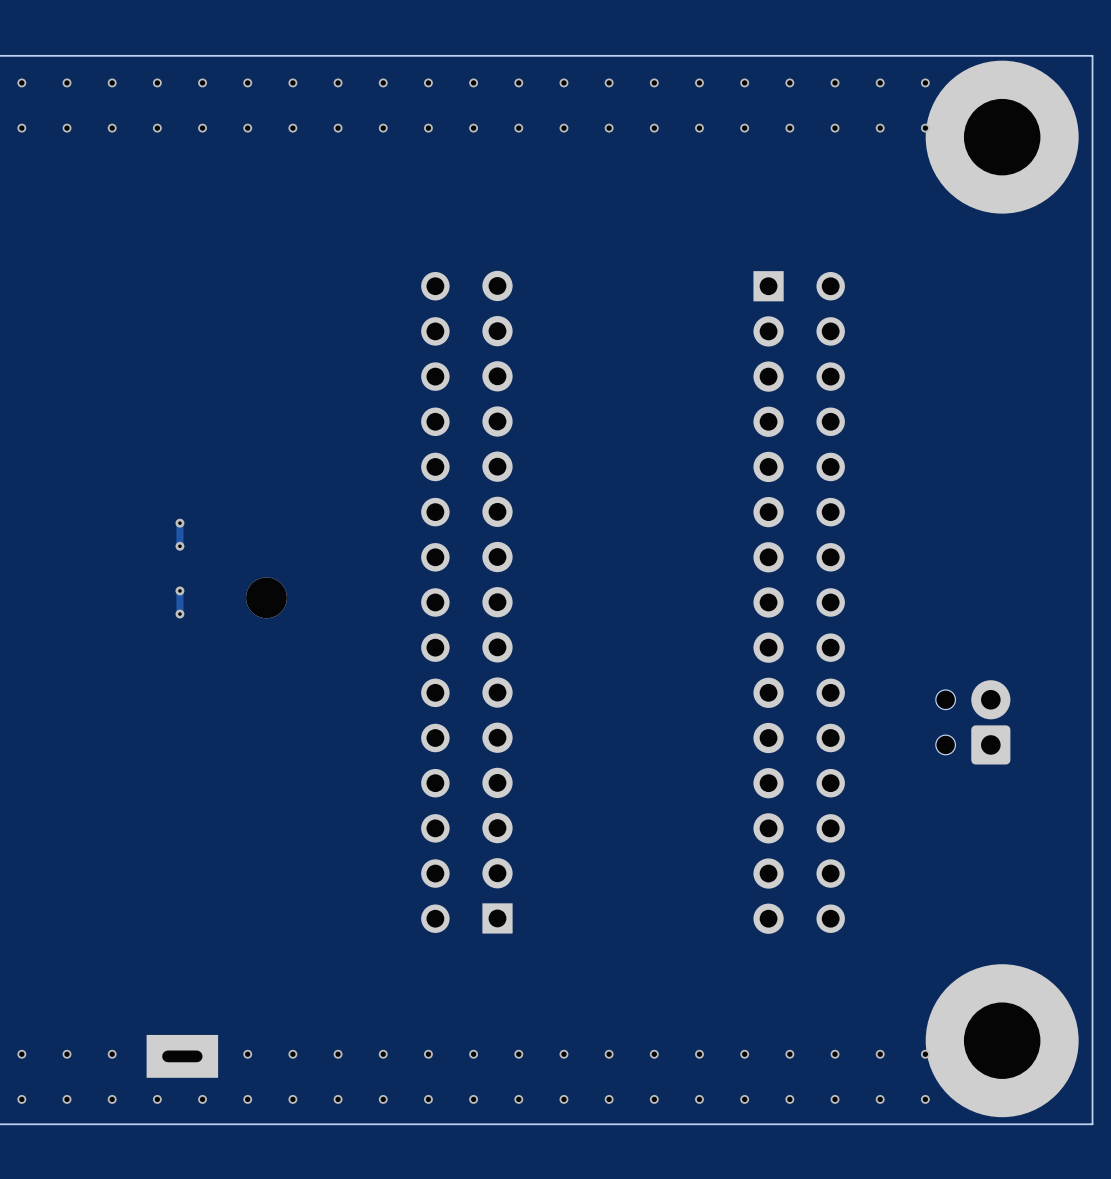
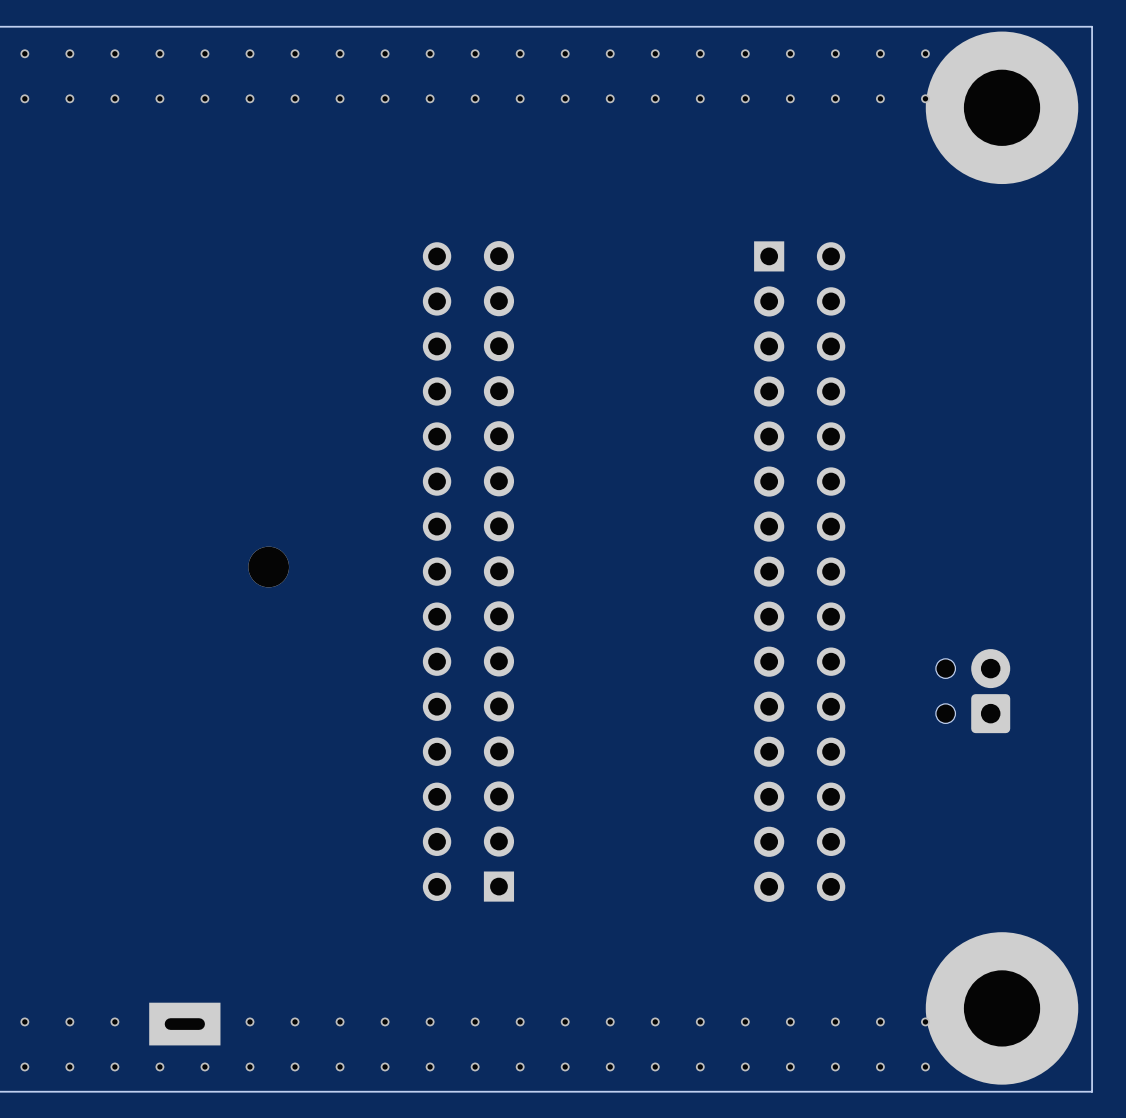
track: (179, 523) (179, 546) -> none
via: (179, 523) -> none
via: (179, 546) -> none
track: (179, 590) (179, 614) -> none
via: (179, 590) -> none
via: (179, 614) -> none

